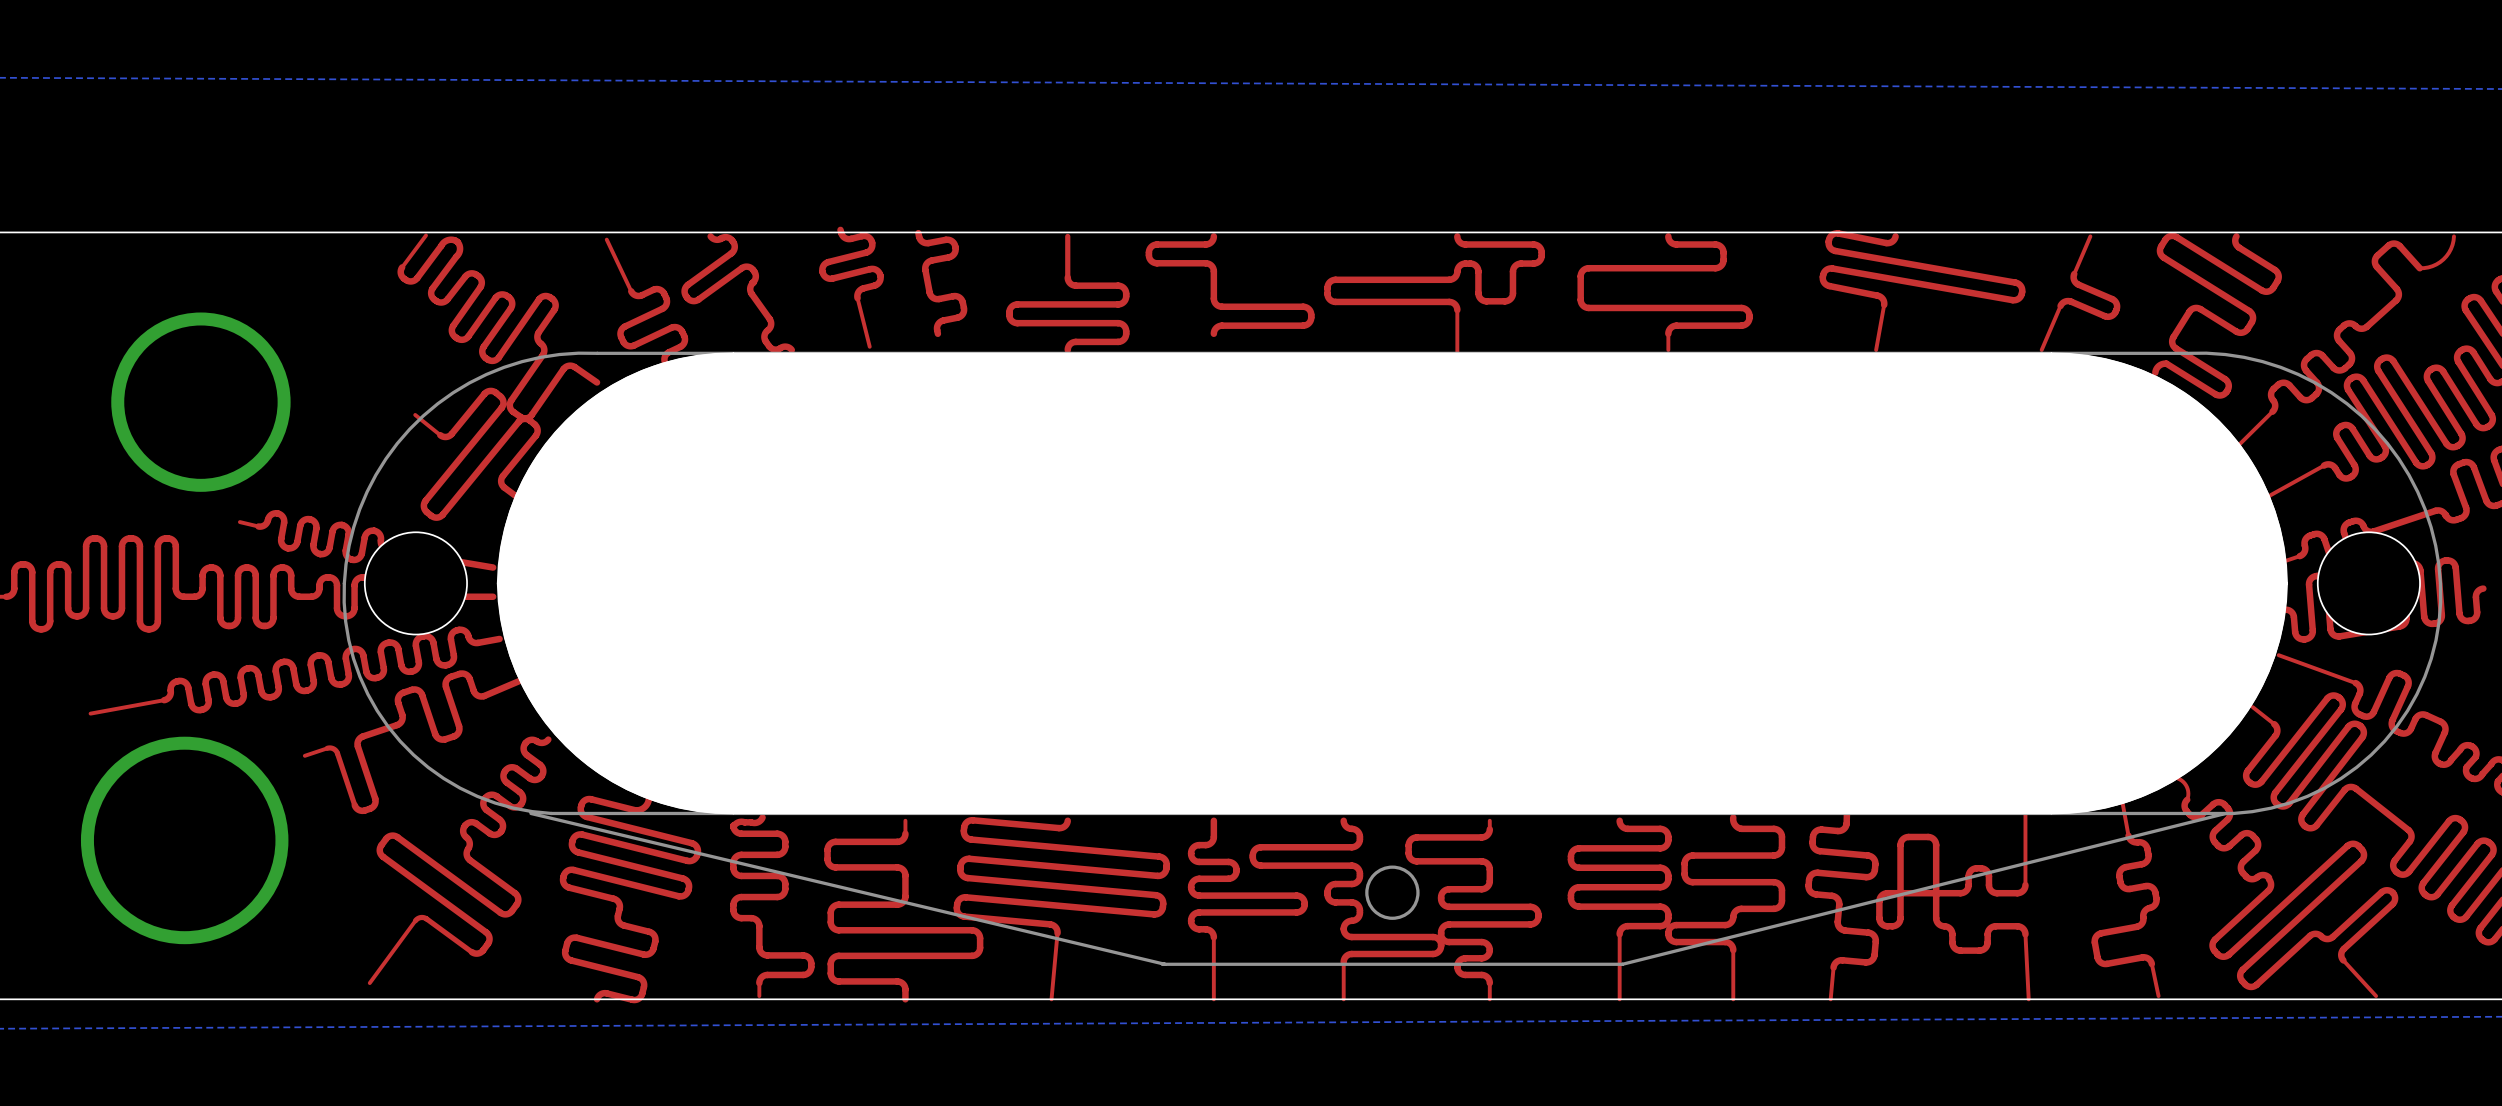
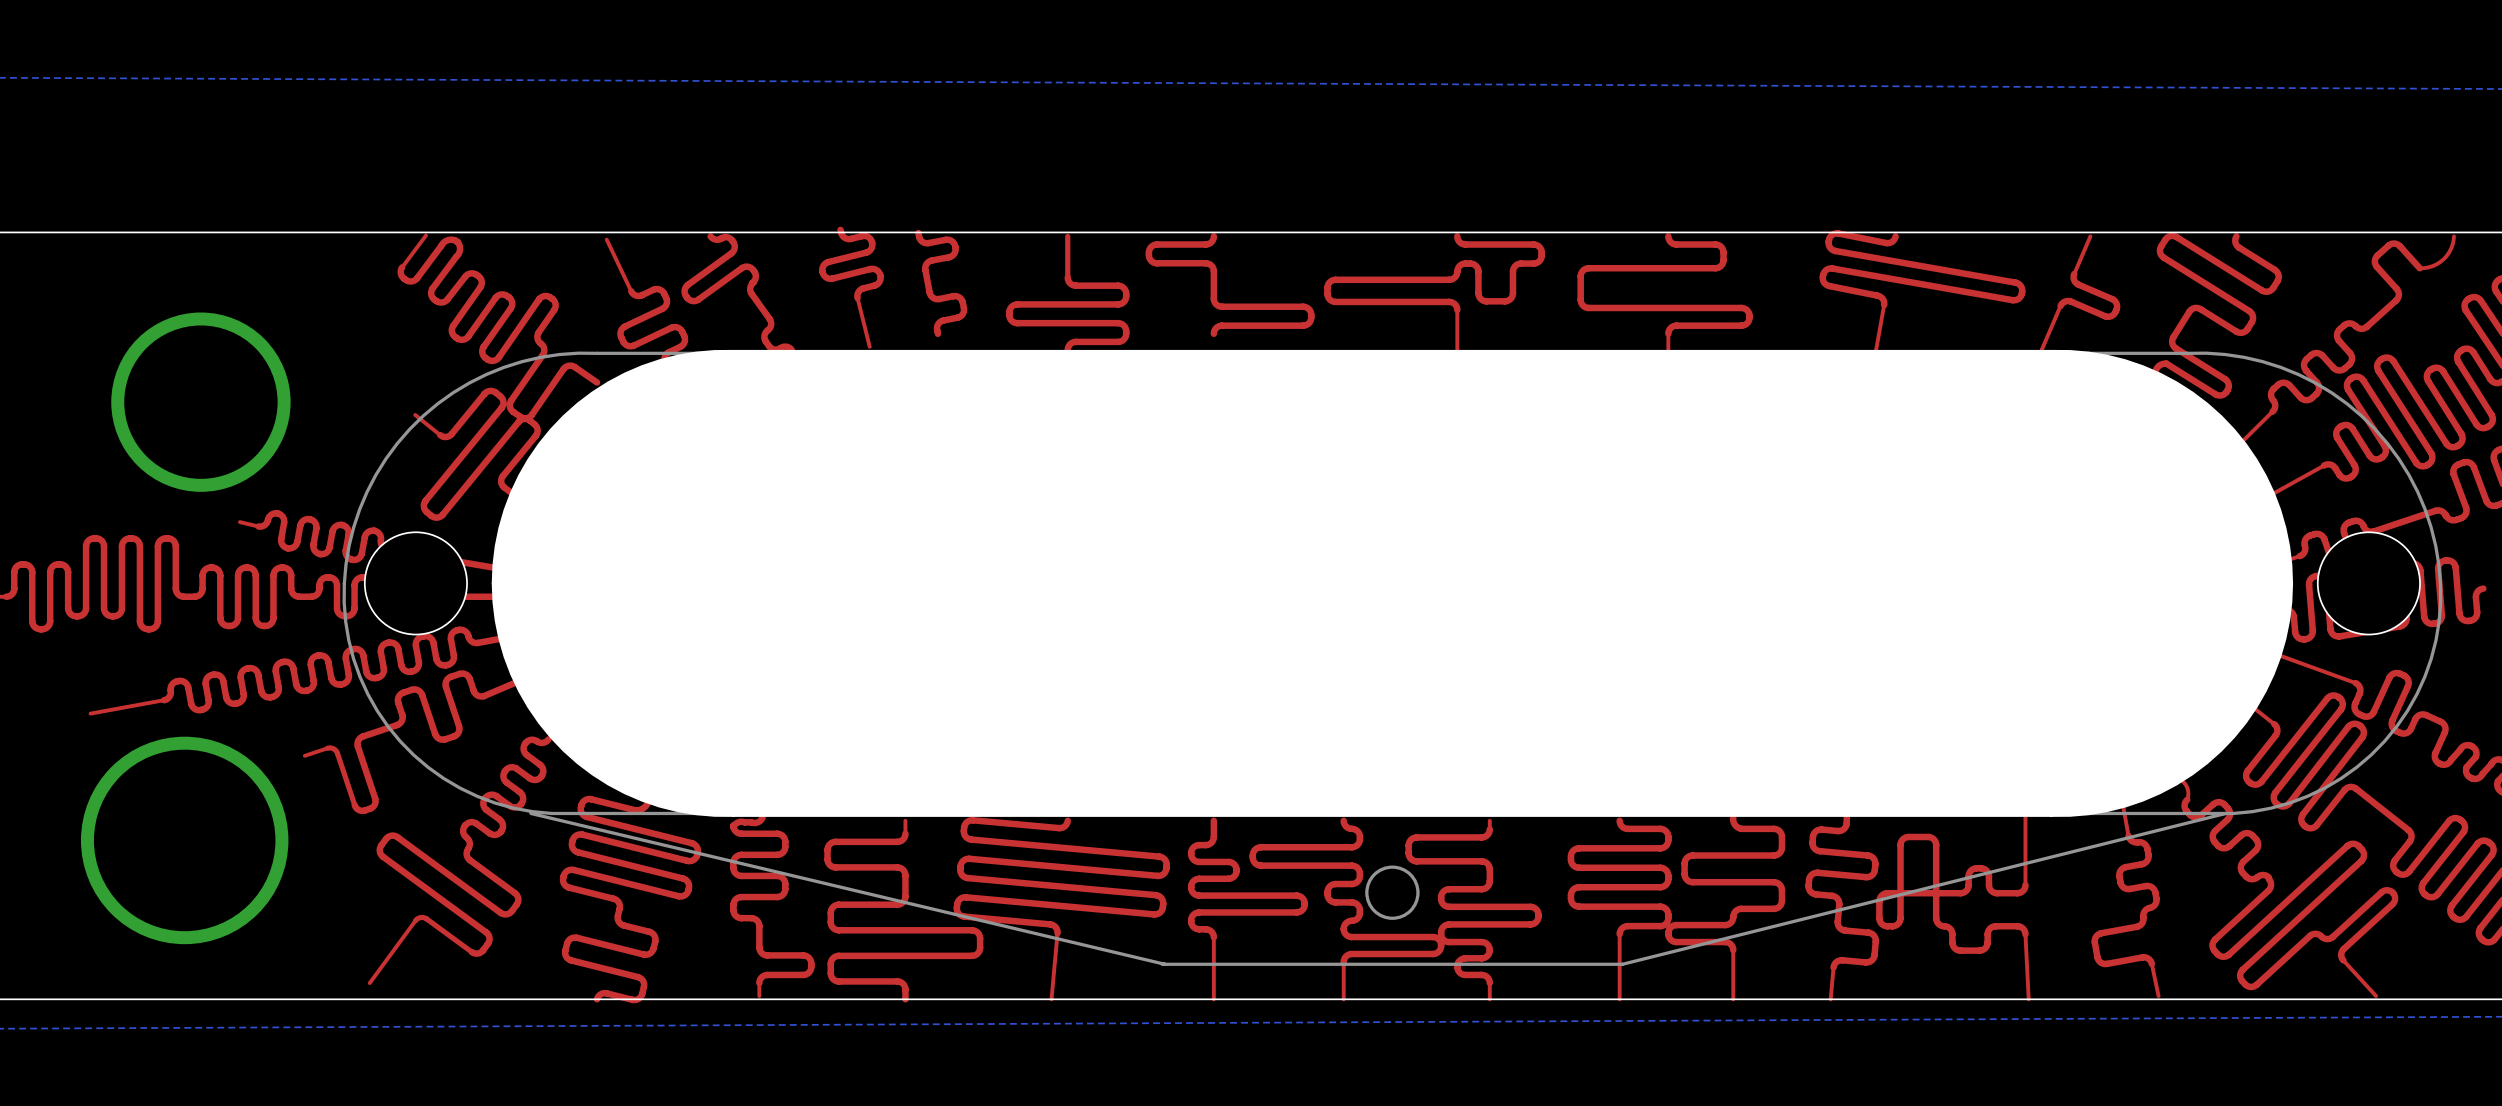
part footprint: [342, 351, 2443, 966] -> [342, 350, 2443, 966]

